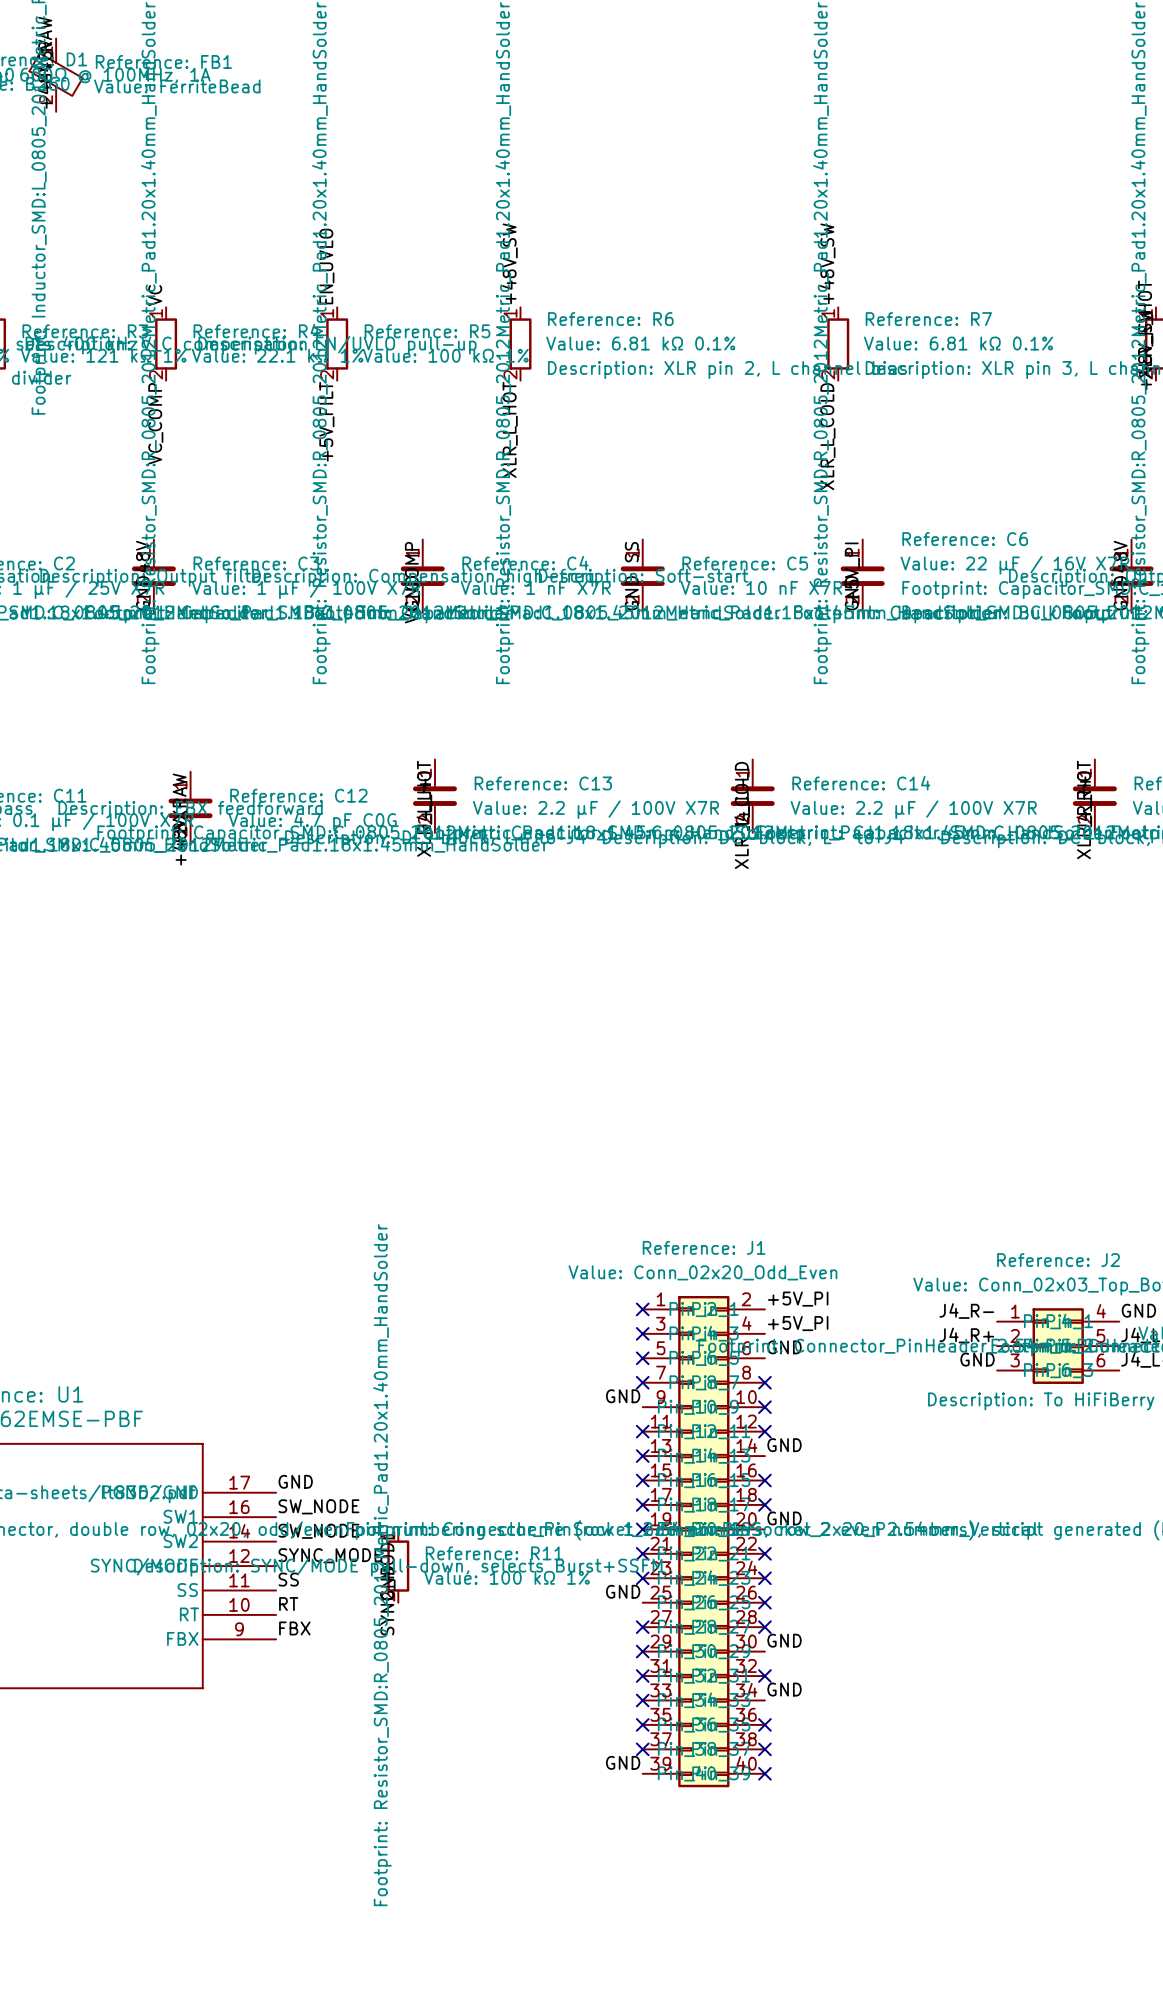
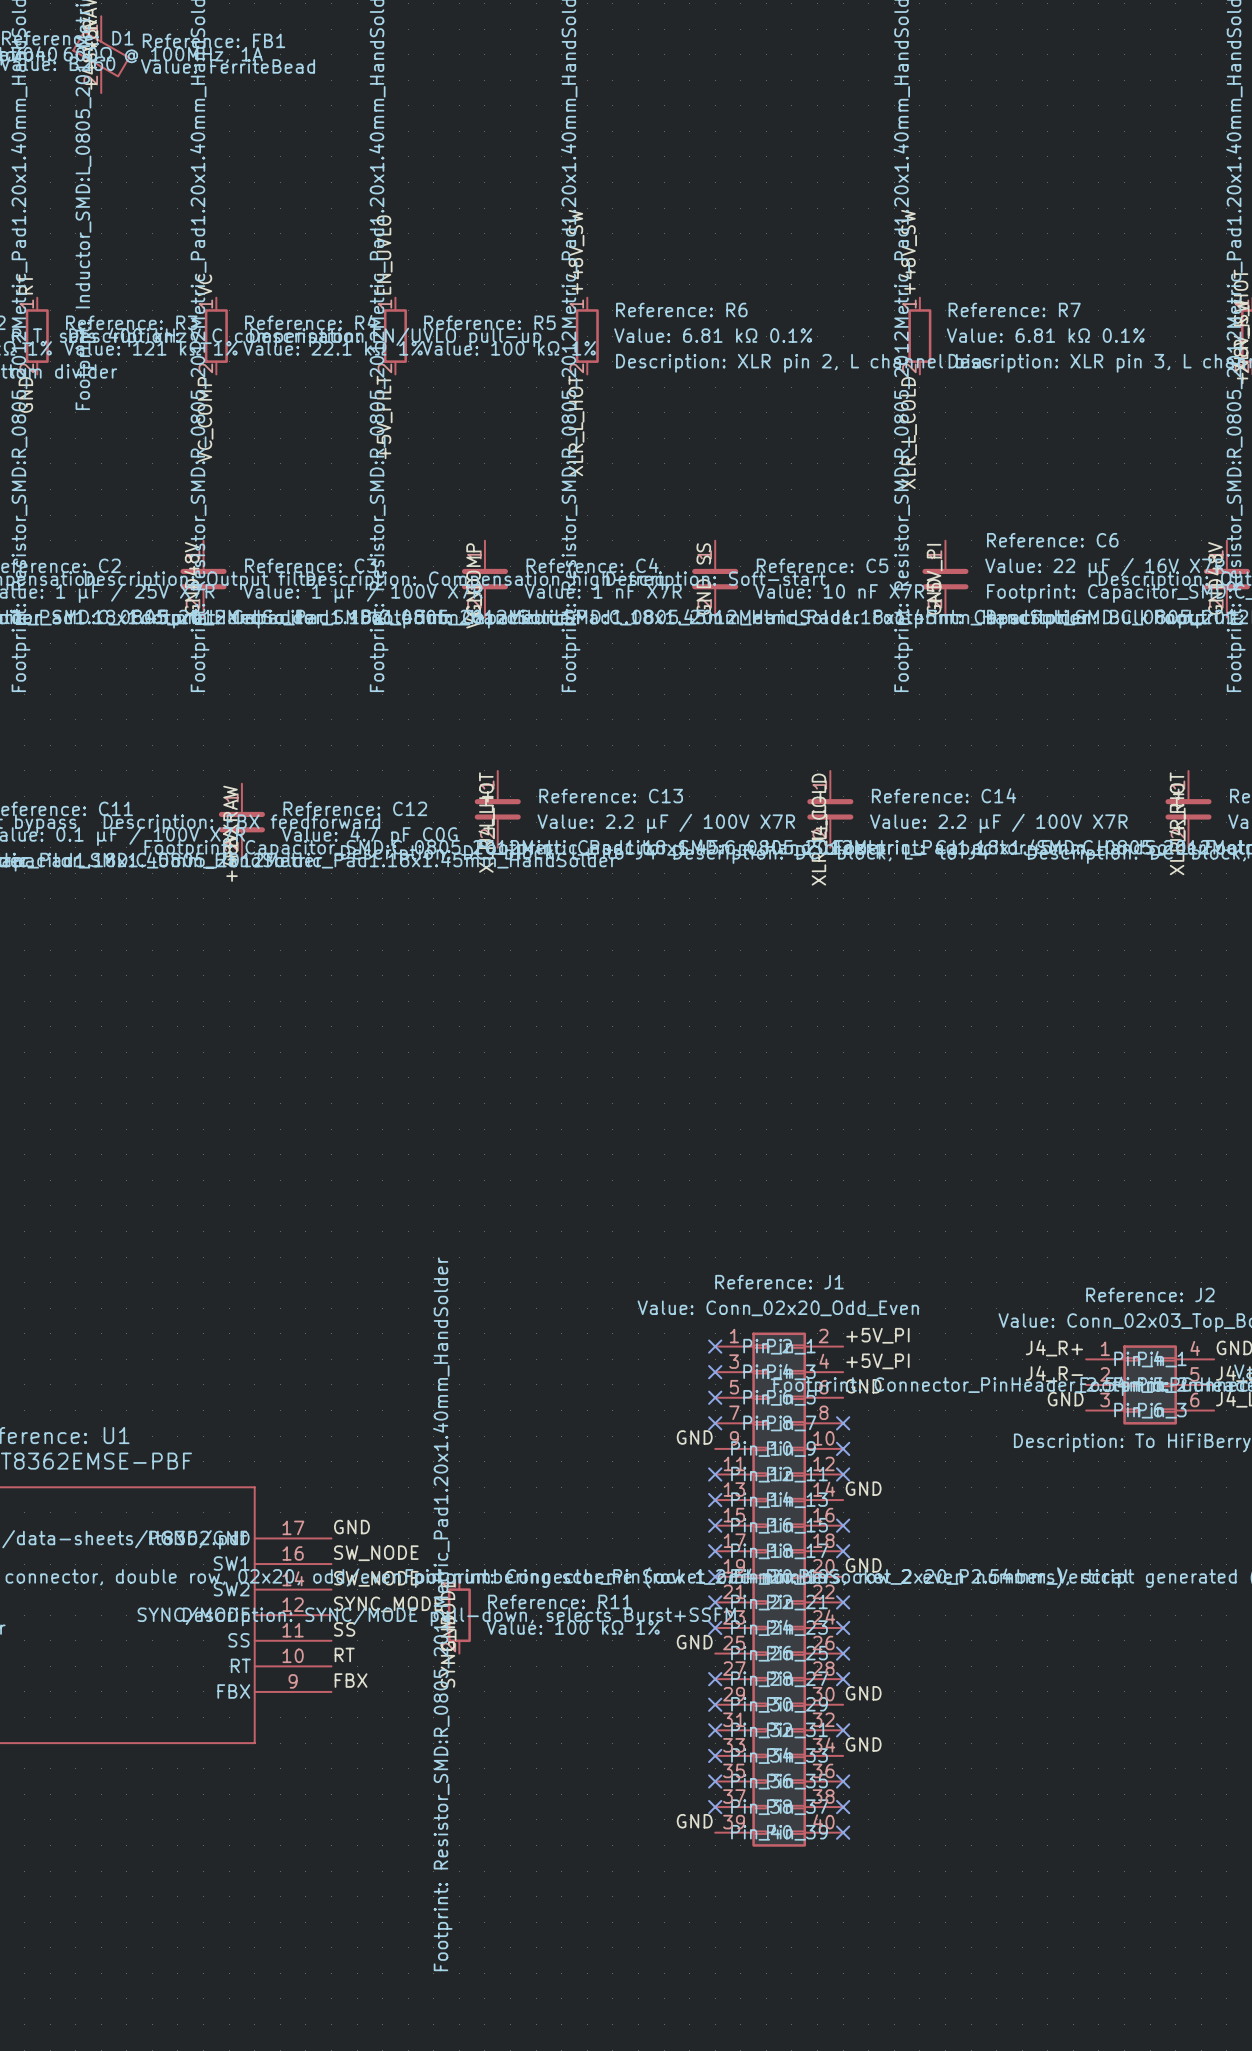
label: J4_R- (966, 1311) -> J4_R+ (1054, 1348)
label: J4_R+ (966, 1335) -> J4_R- (1054, 1373)

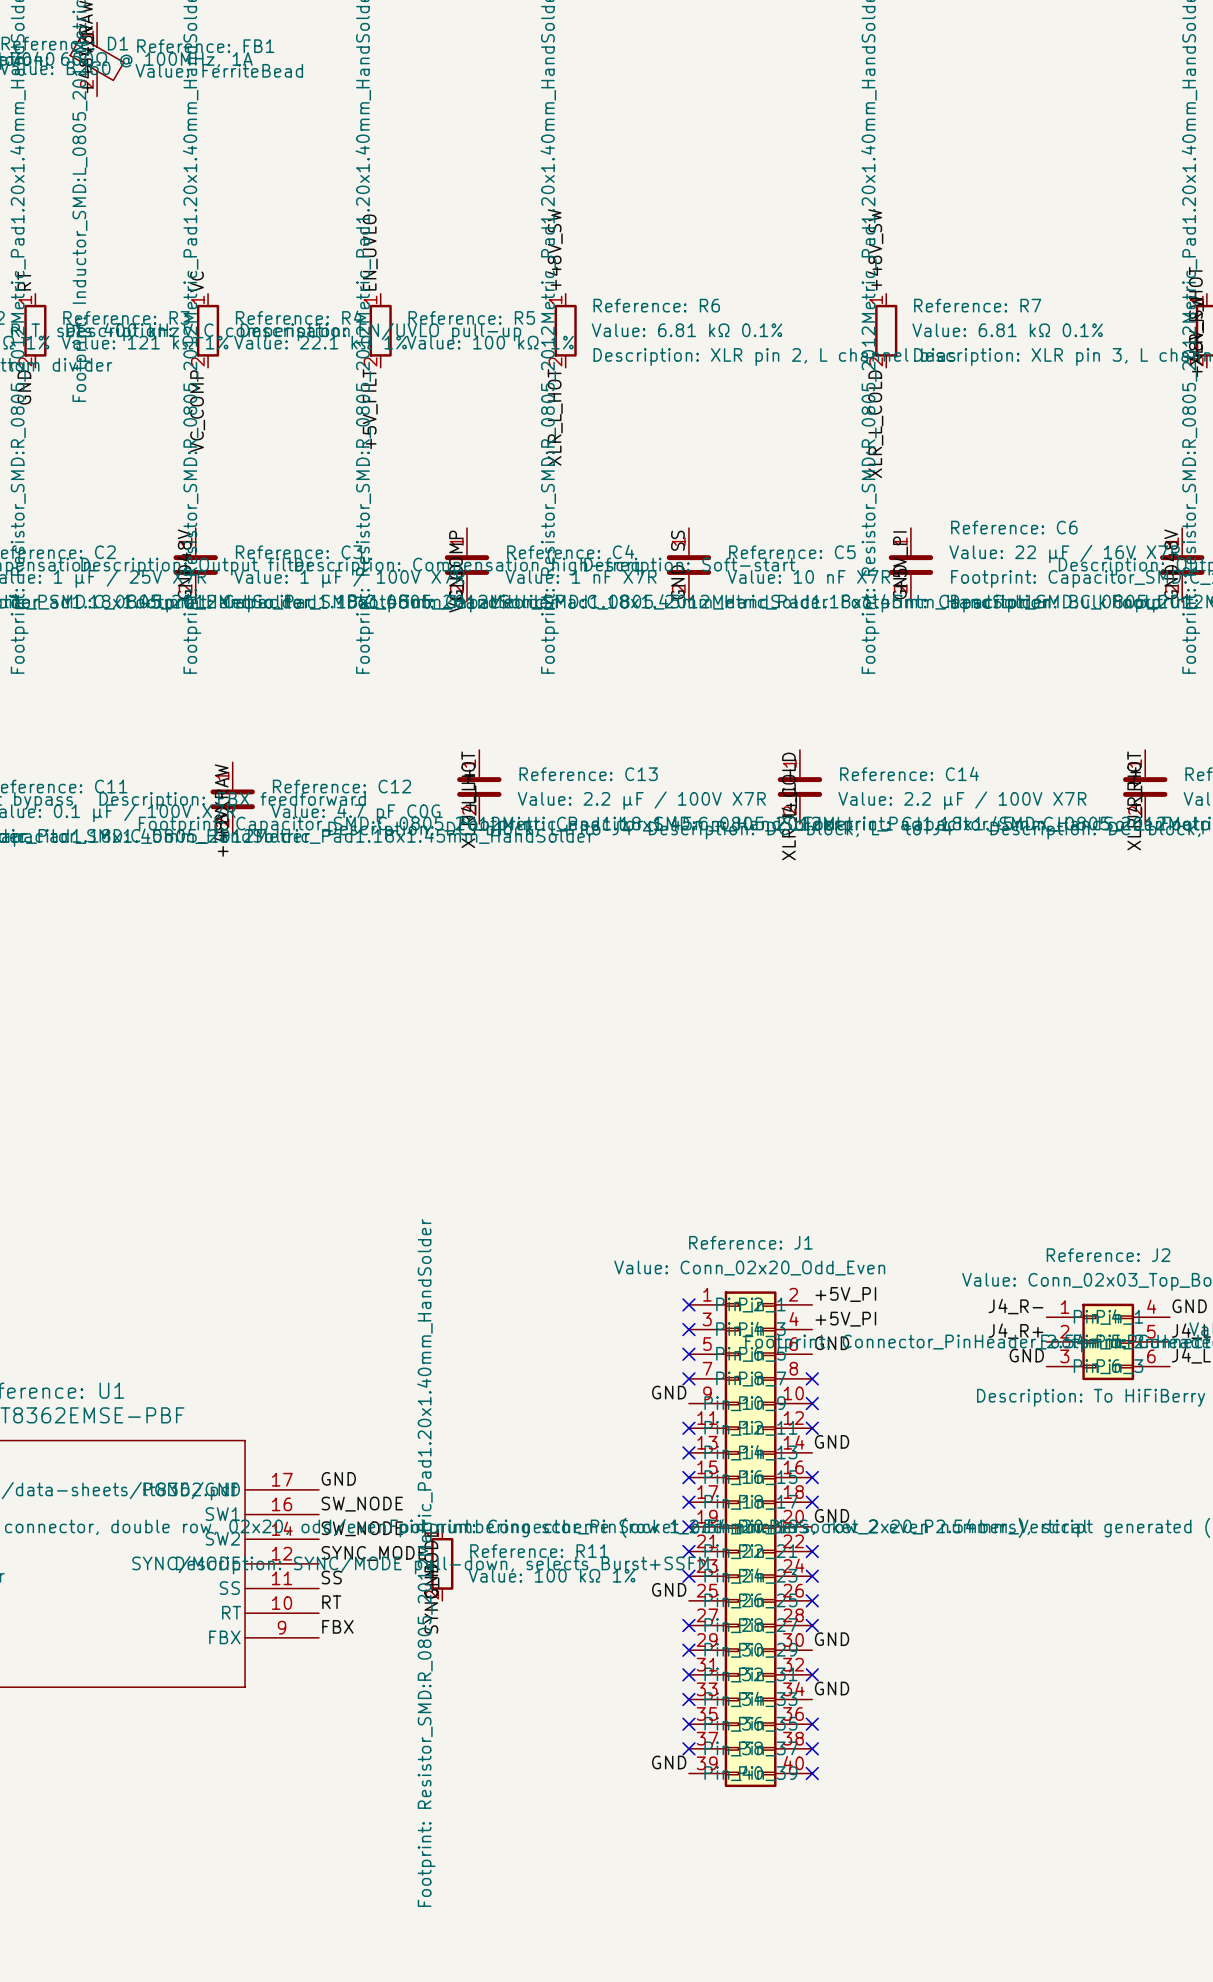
label: J4_R+ (1054, 1348) -> J4_R- (1015, 1306)
label: J4_R- (1054, 1373) -> J4_R+ (1015, 1331)

